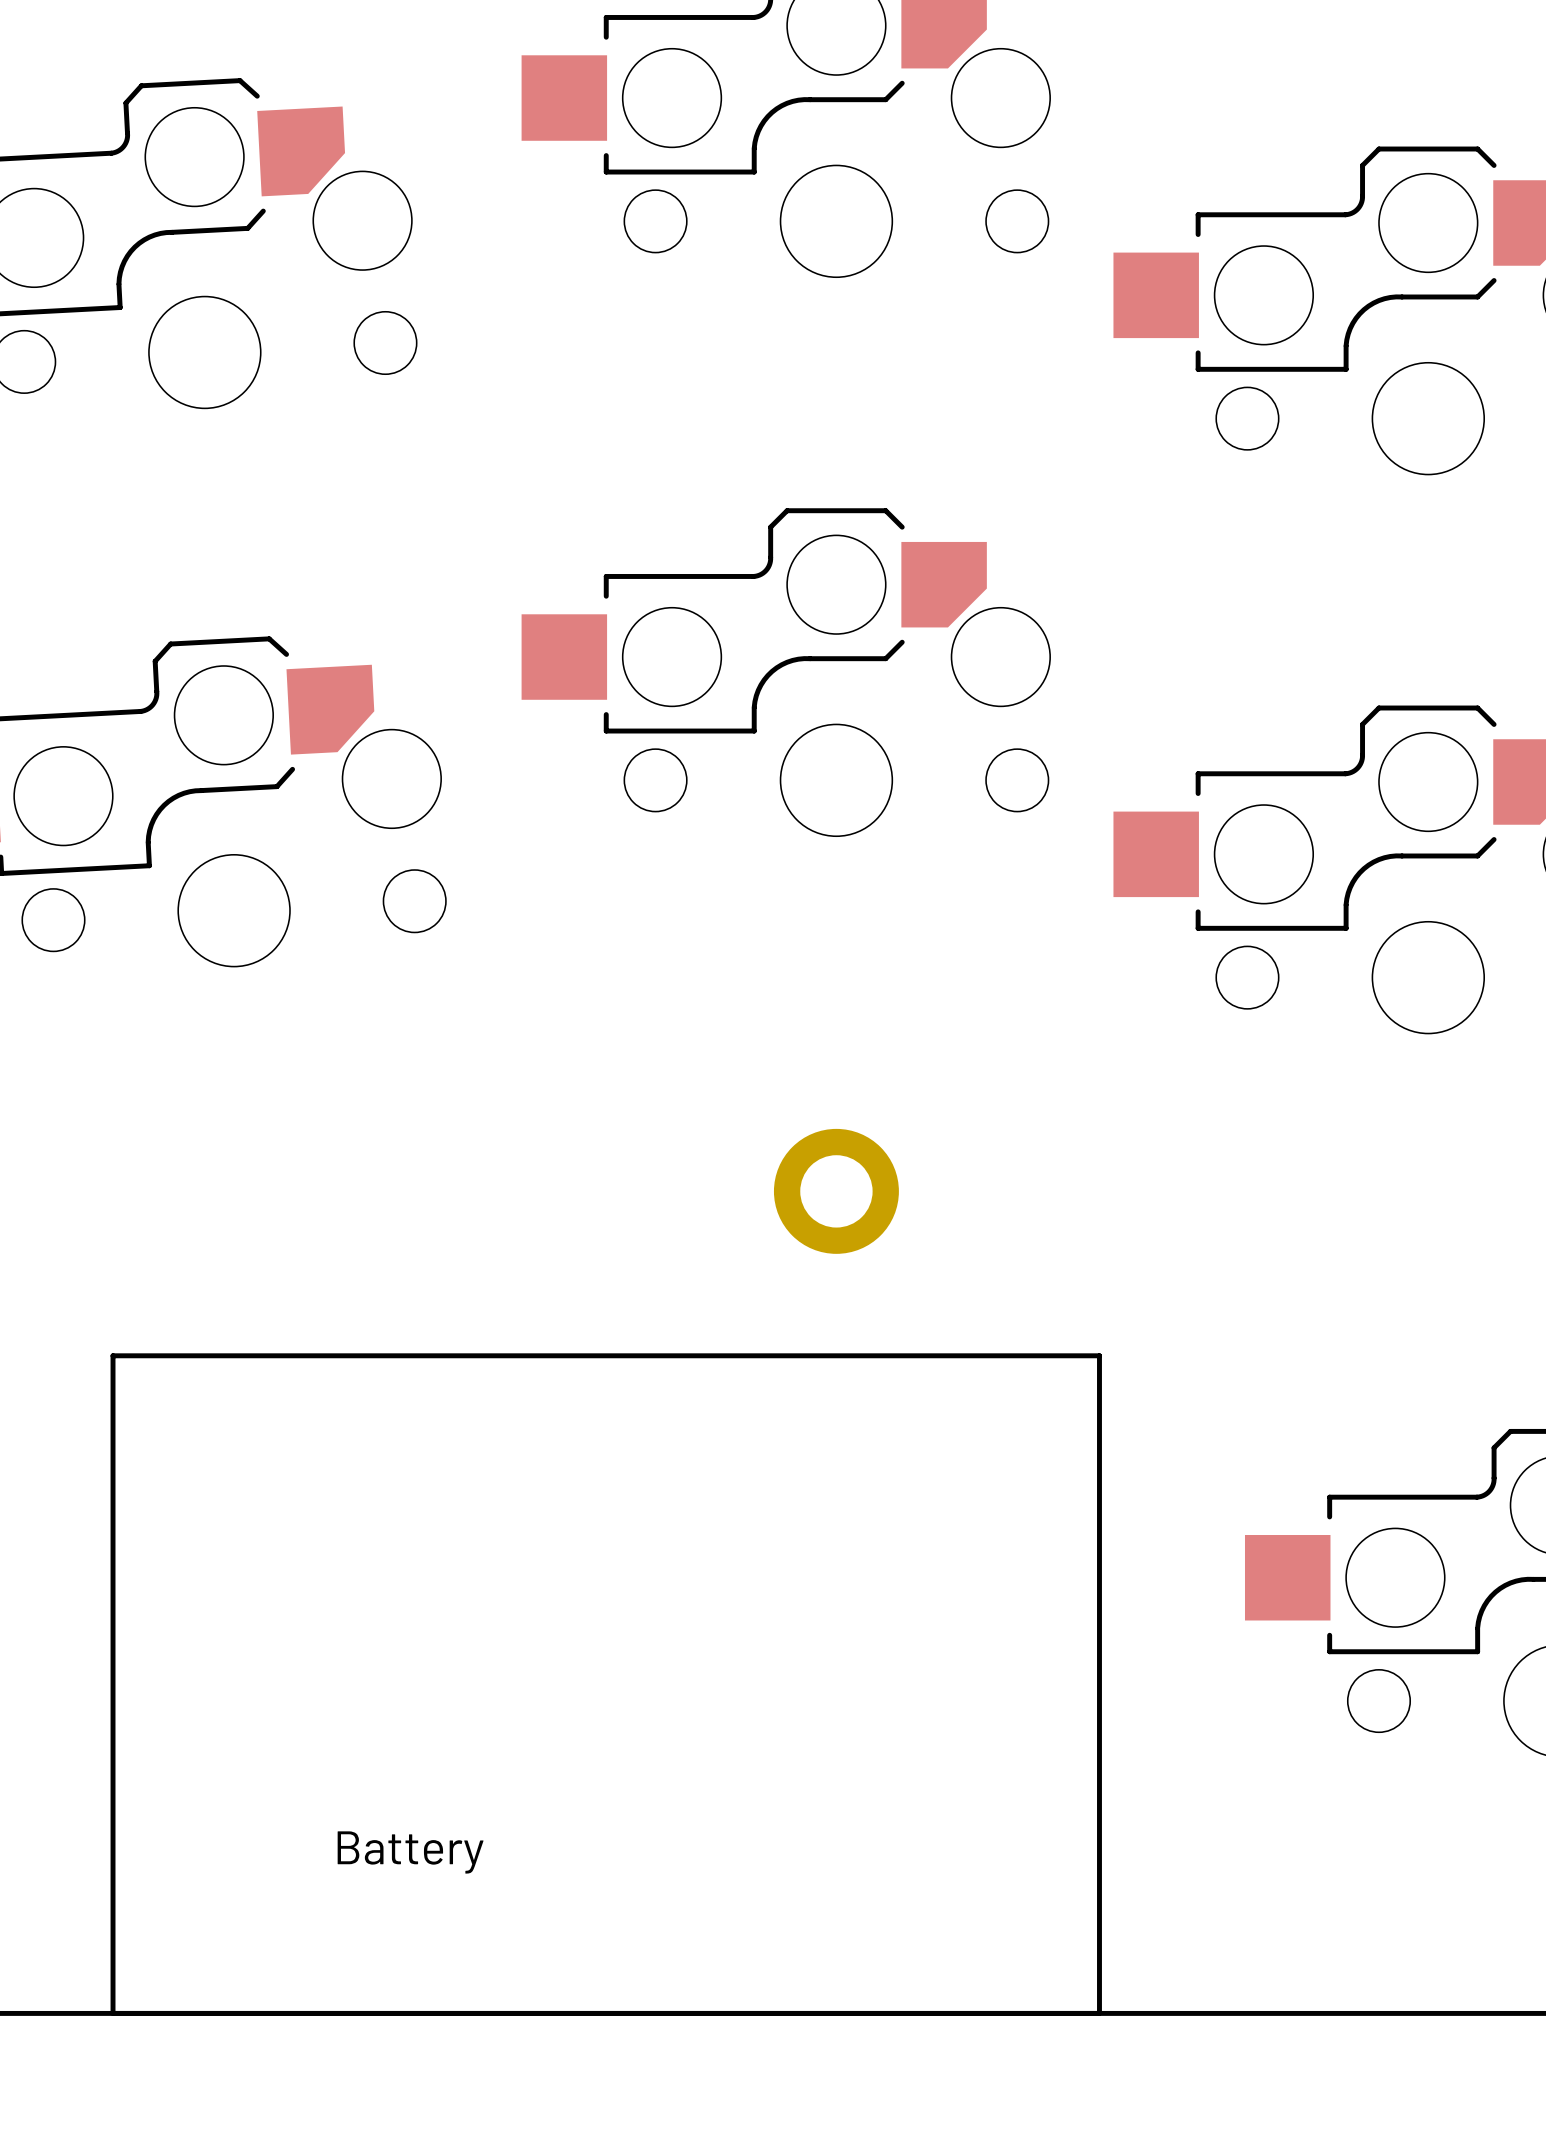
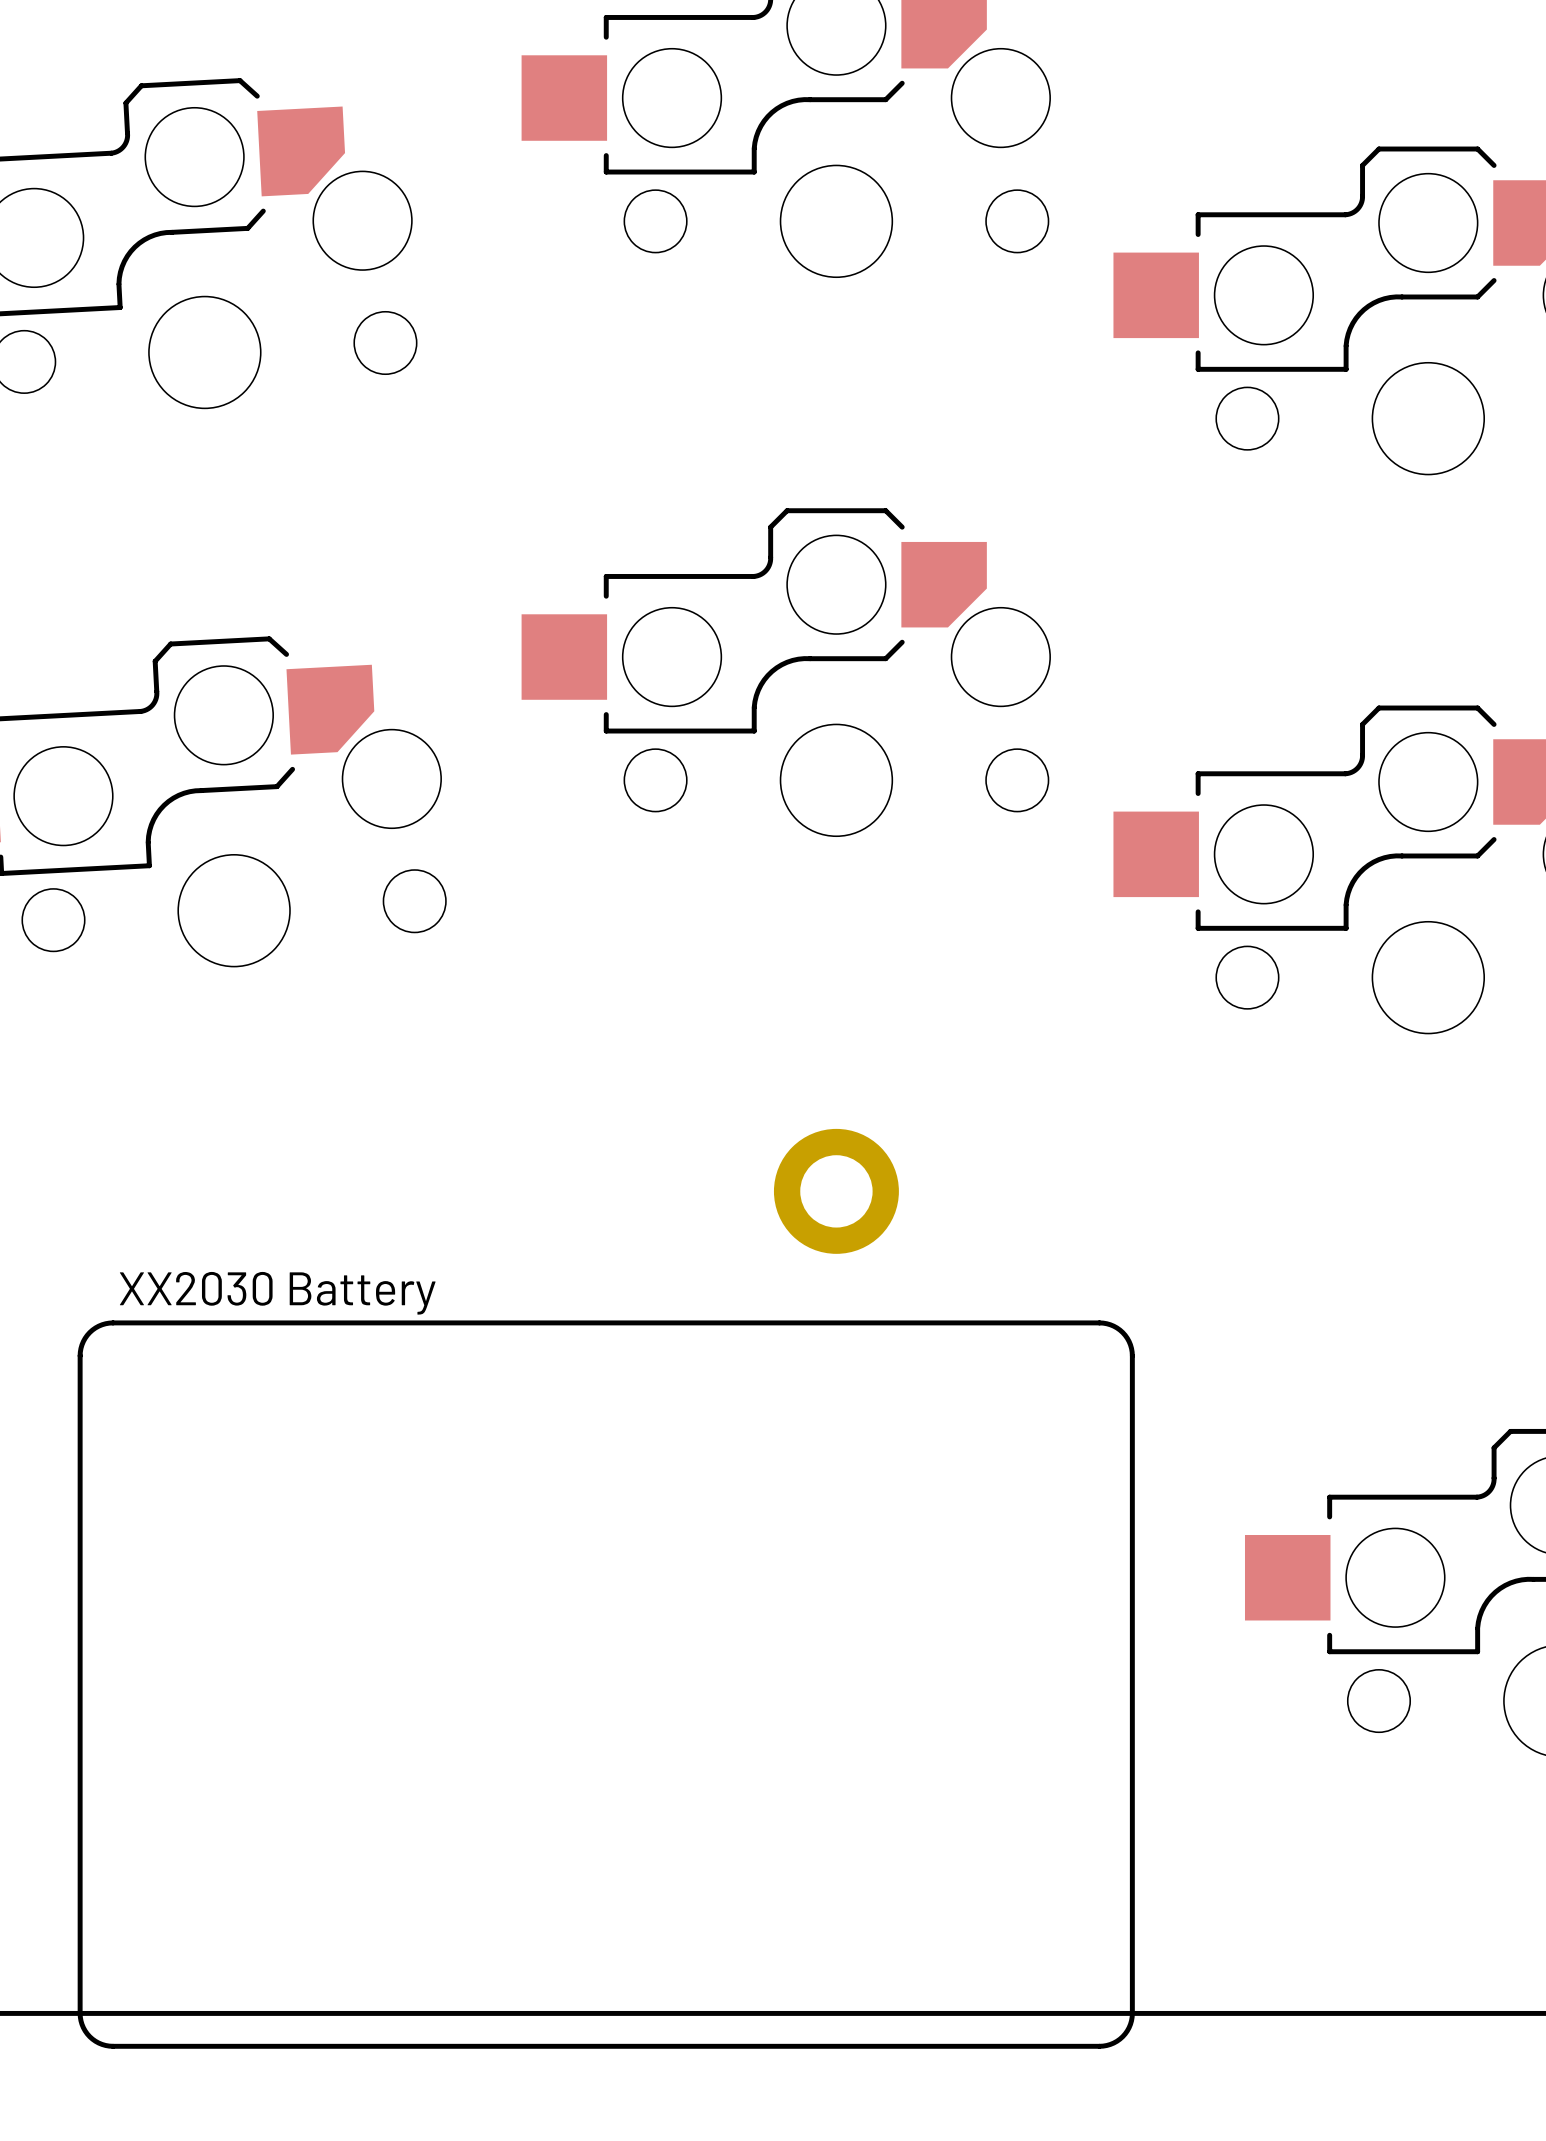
text: none -> XX2030 Battery (277, 1293)
line: (113, 1355) (113, 2013) (1099, 2013) (1099, 1355) (113, 1355) -> (113, 1322) (98, 1326) (89, 1332) (83, 1341) (80, 1355) (80, 2013) (83, 2027) (95, 2041) (113, 2046) (1099, 2046) (1116, 2041) (1127, 2030) (1132, 2013) (1132, 1355) (1129, 1341) (1116, 1327) (1099, 1322) (113, 1322)
text: Battery (410, 1852) -> none

